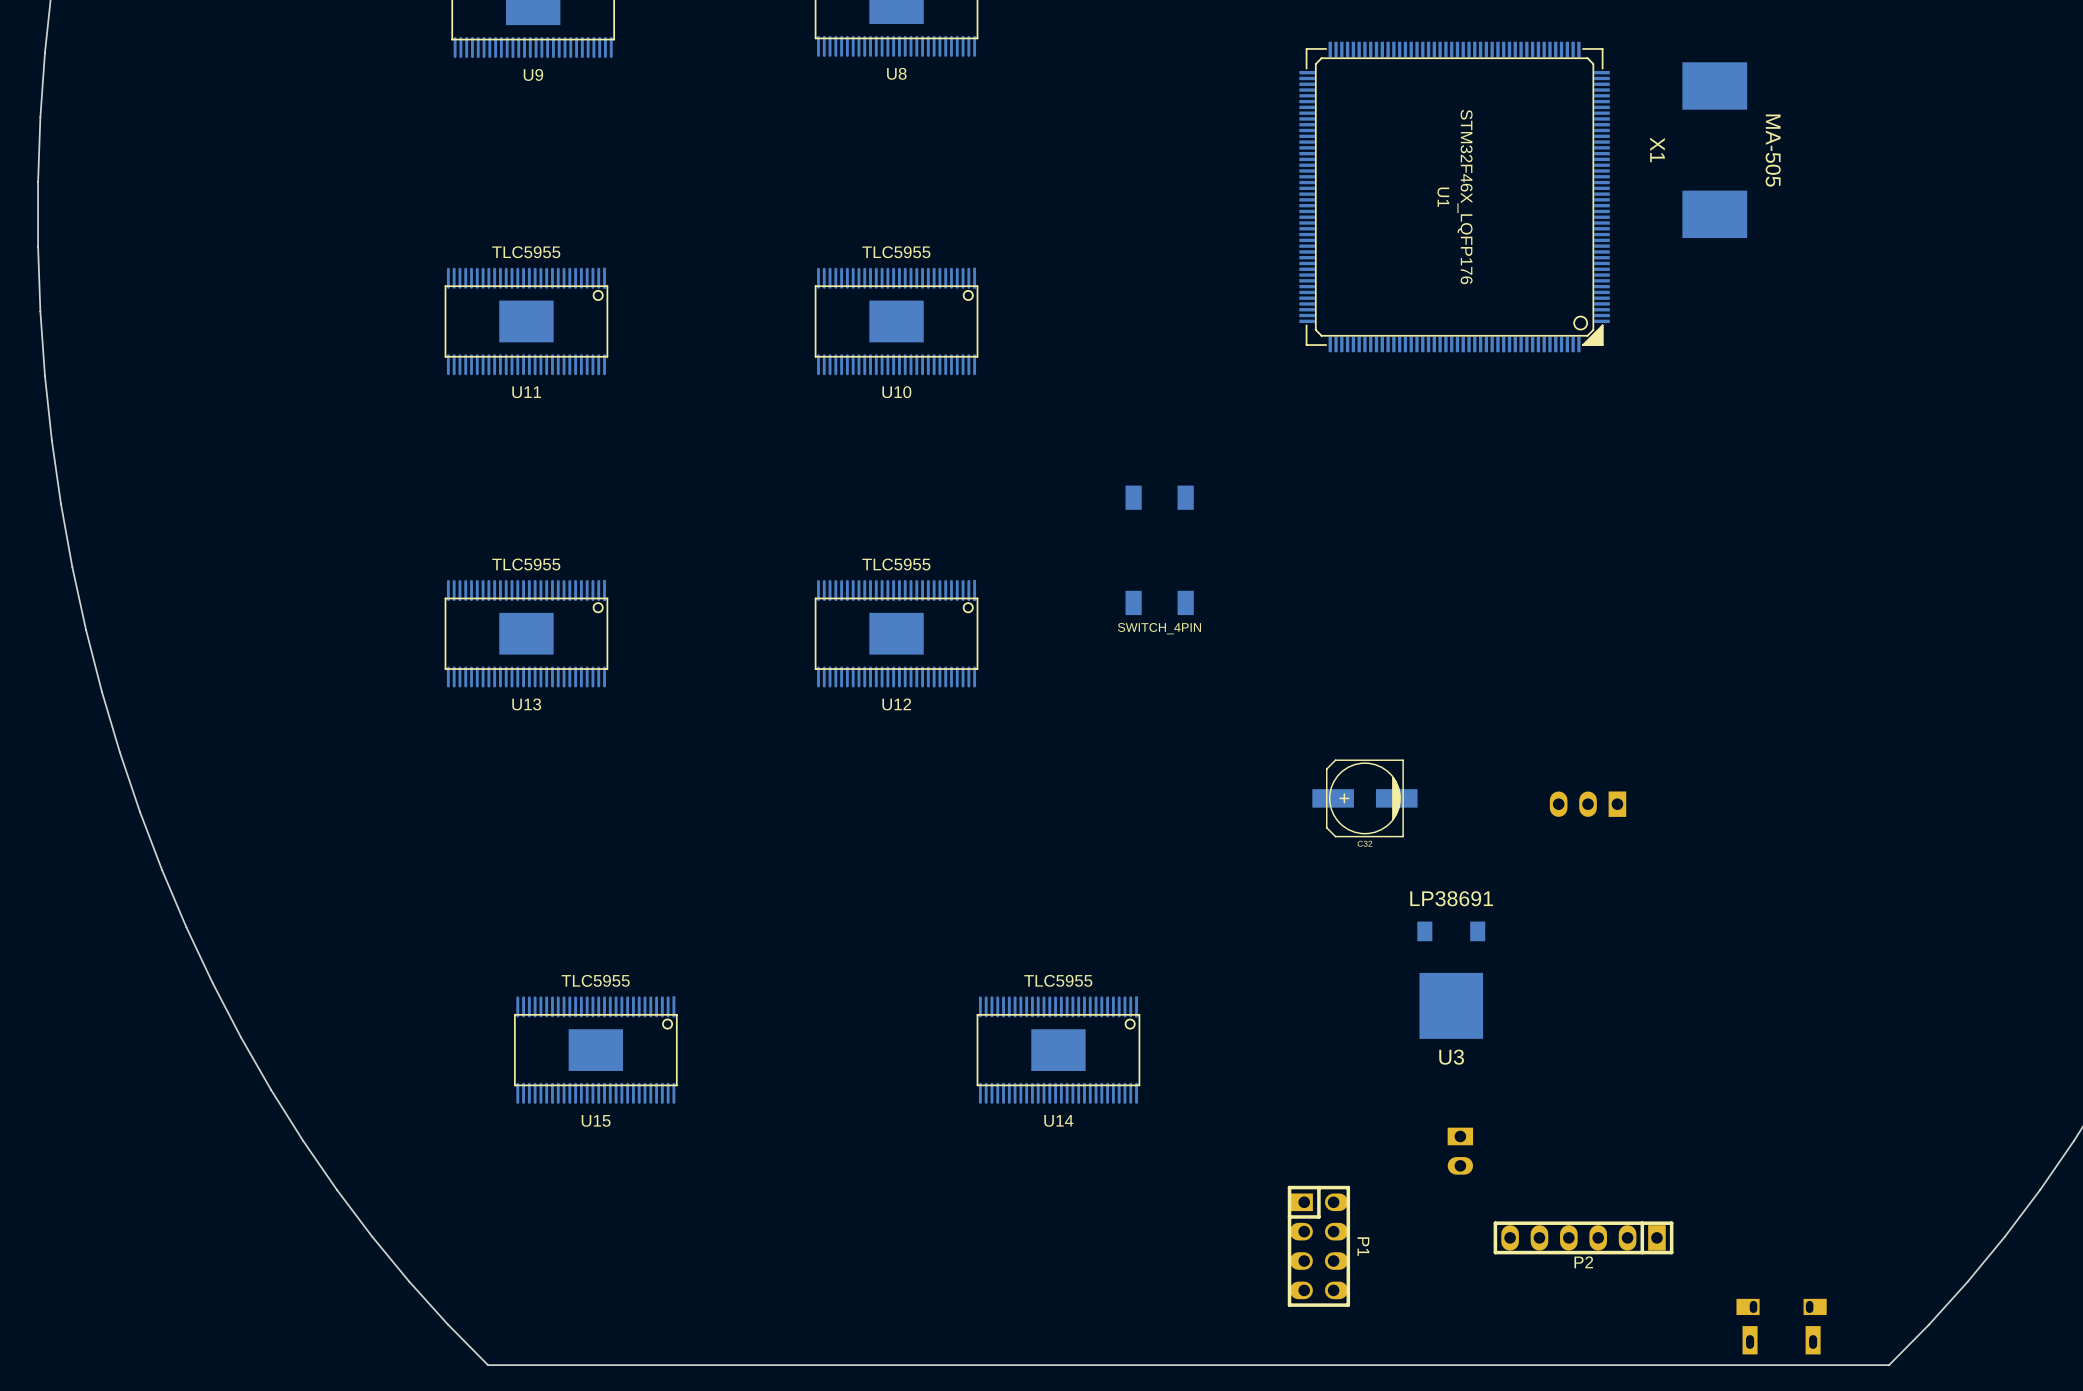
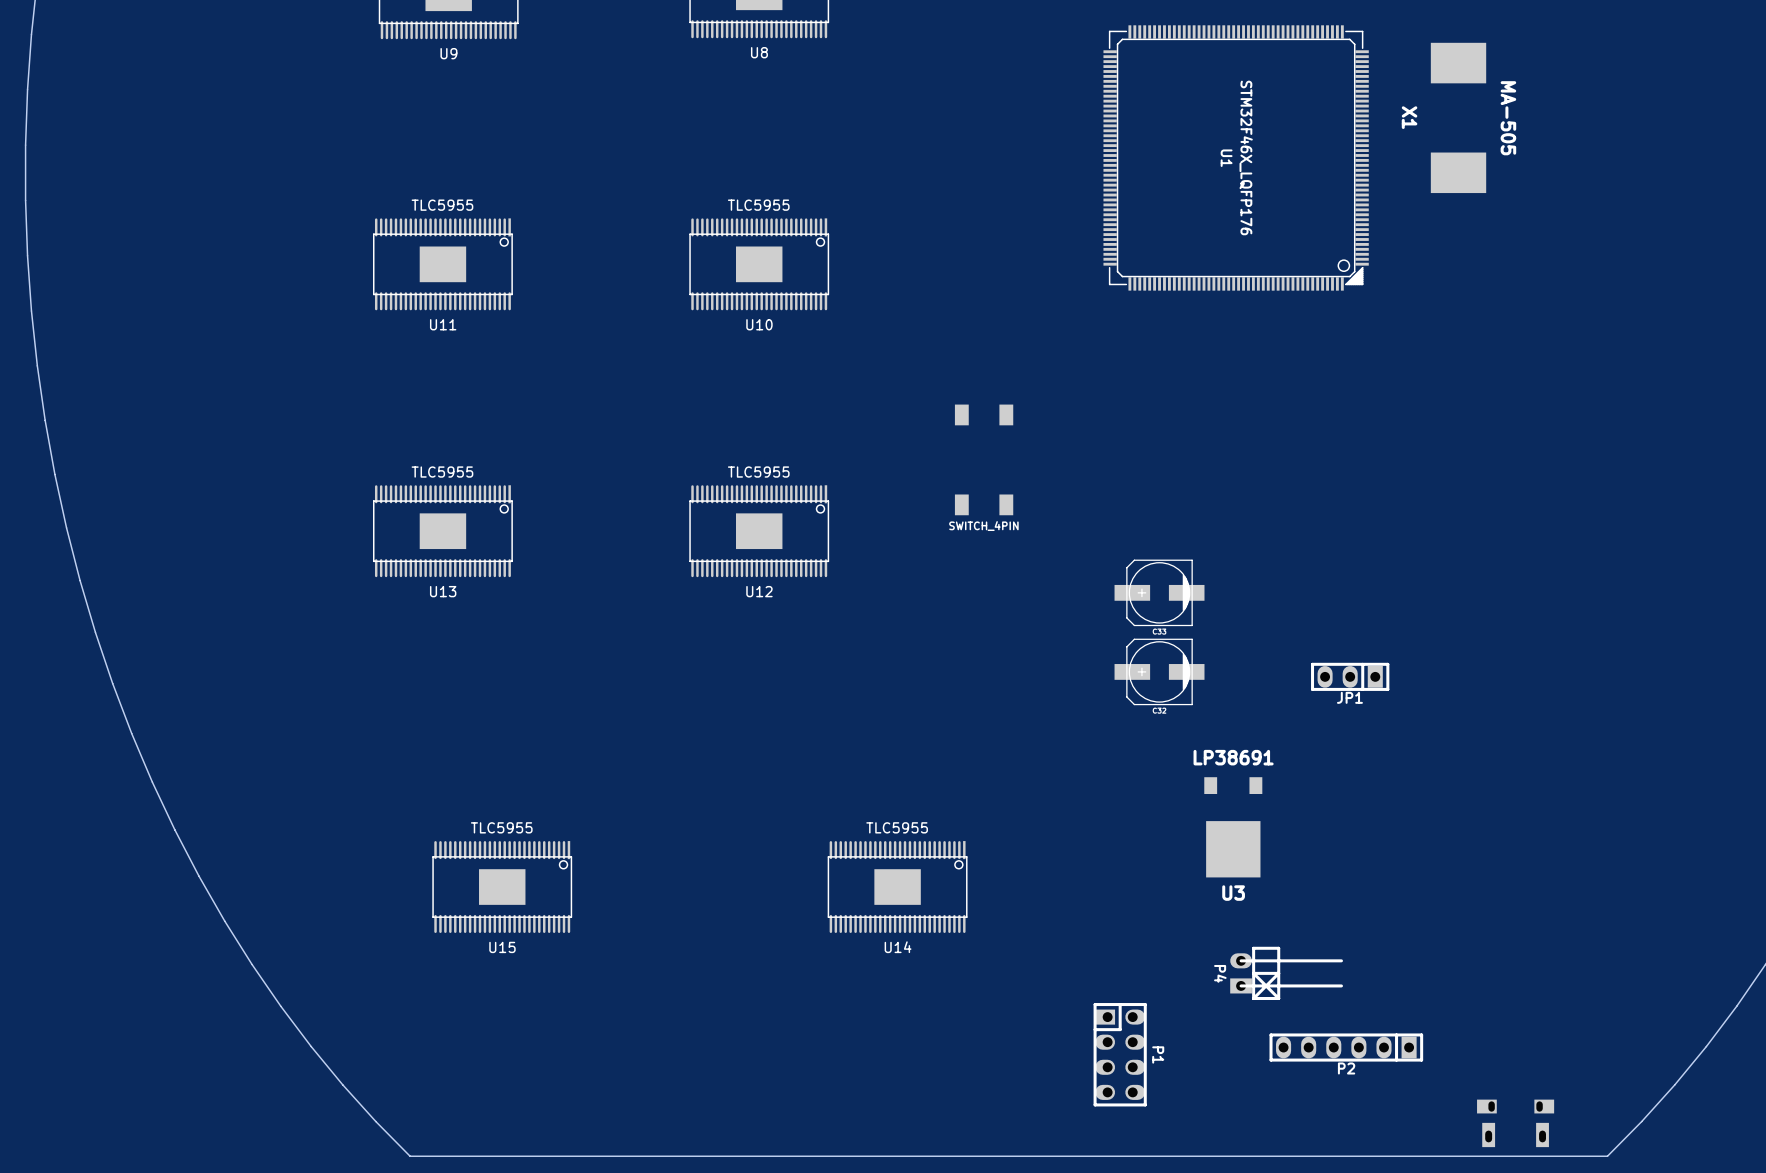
part: none -> (1159, 592)
JP1 side: top (1588, 804) -> bottom (1350, 676)
P4 side: top (1460, 1151) -> bottom (1286, 973)

